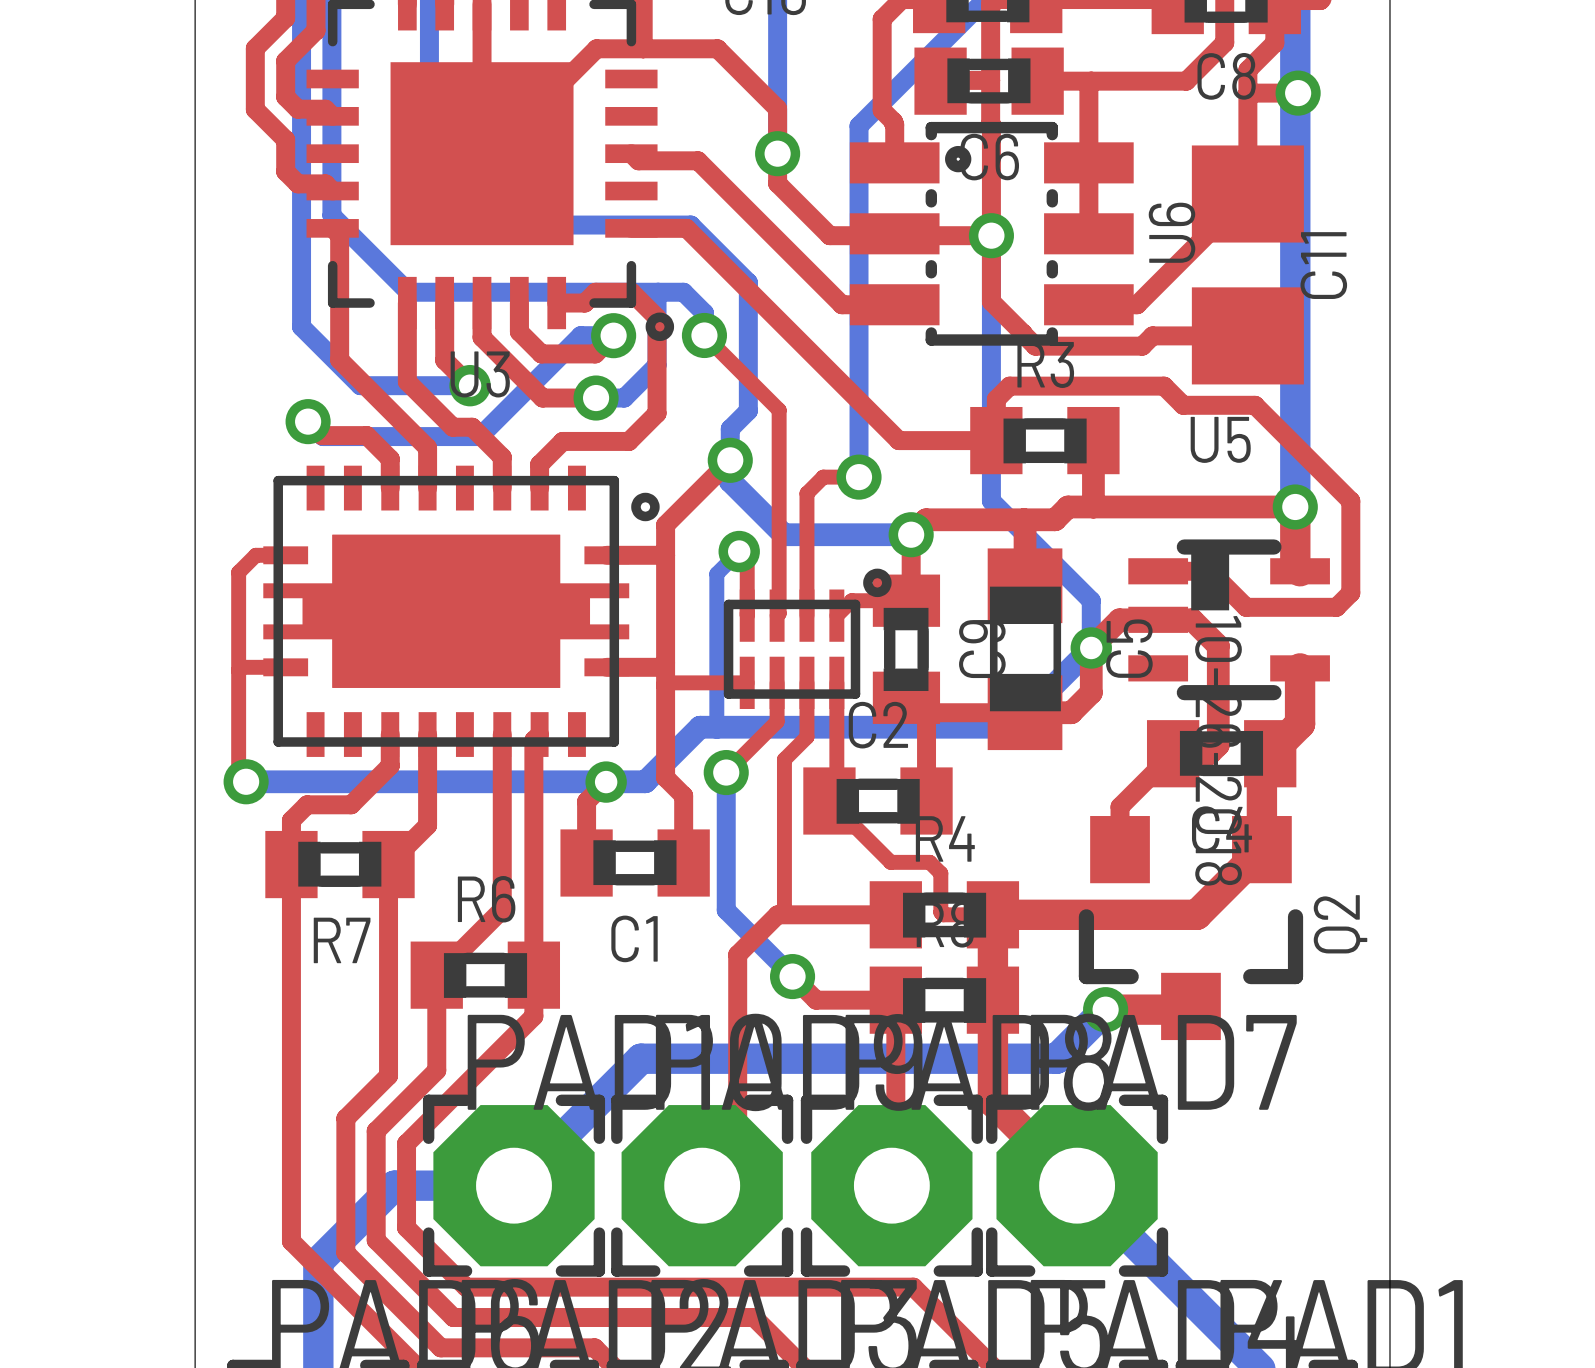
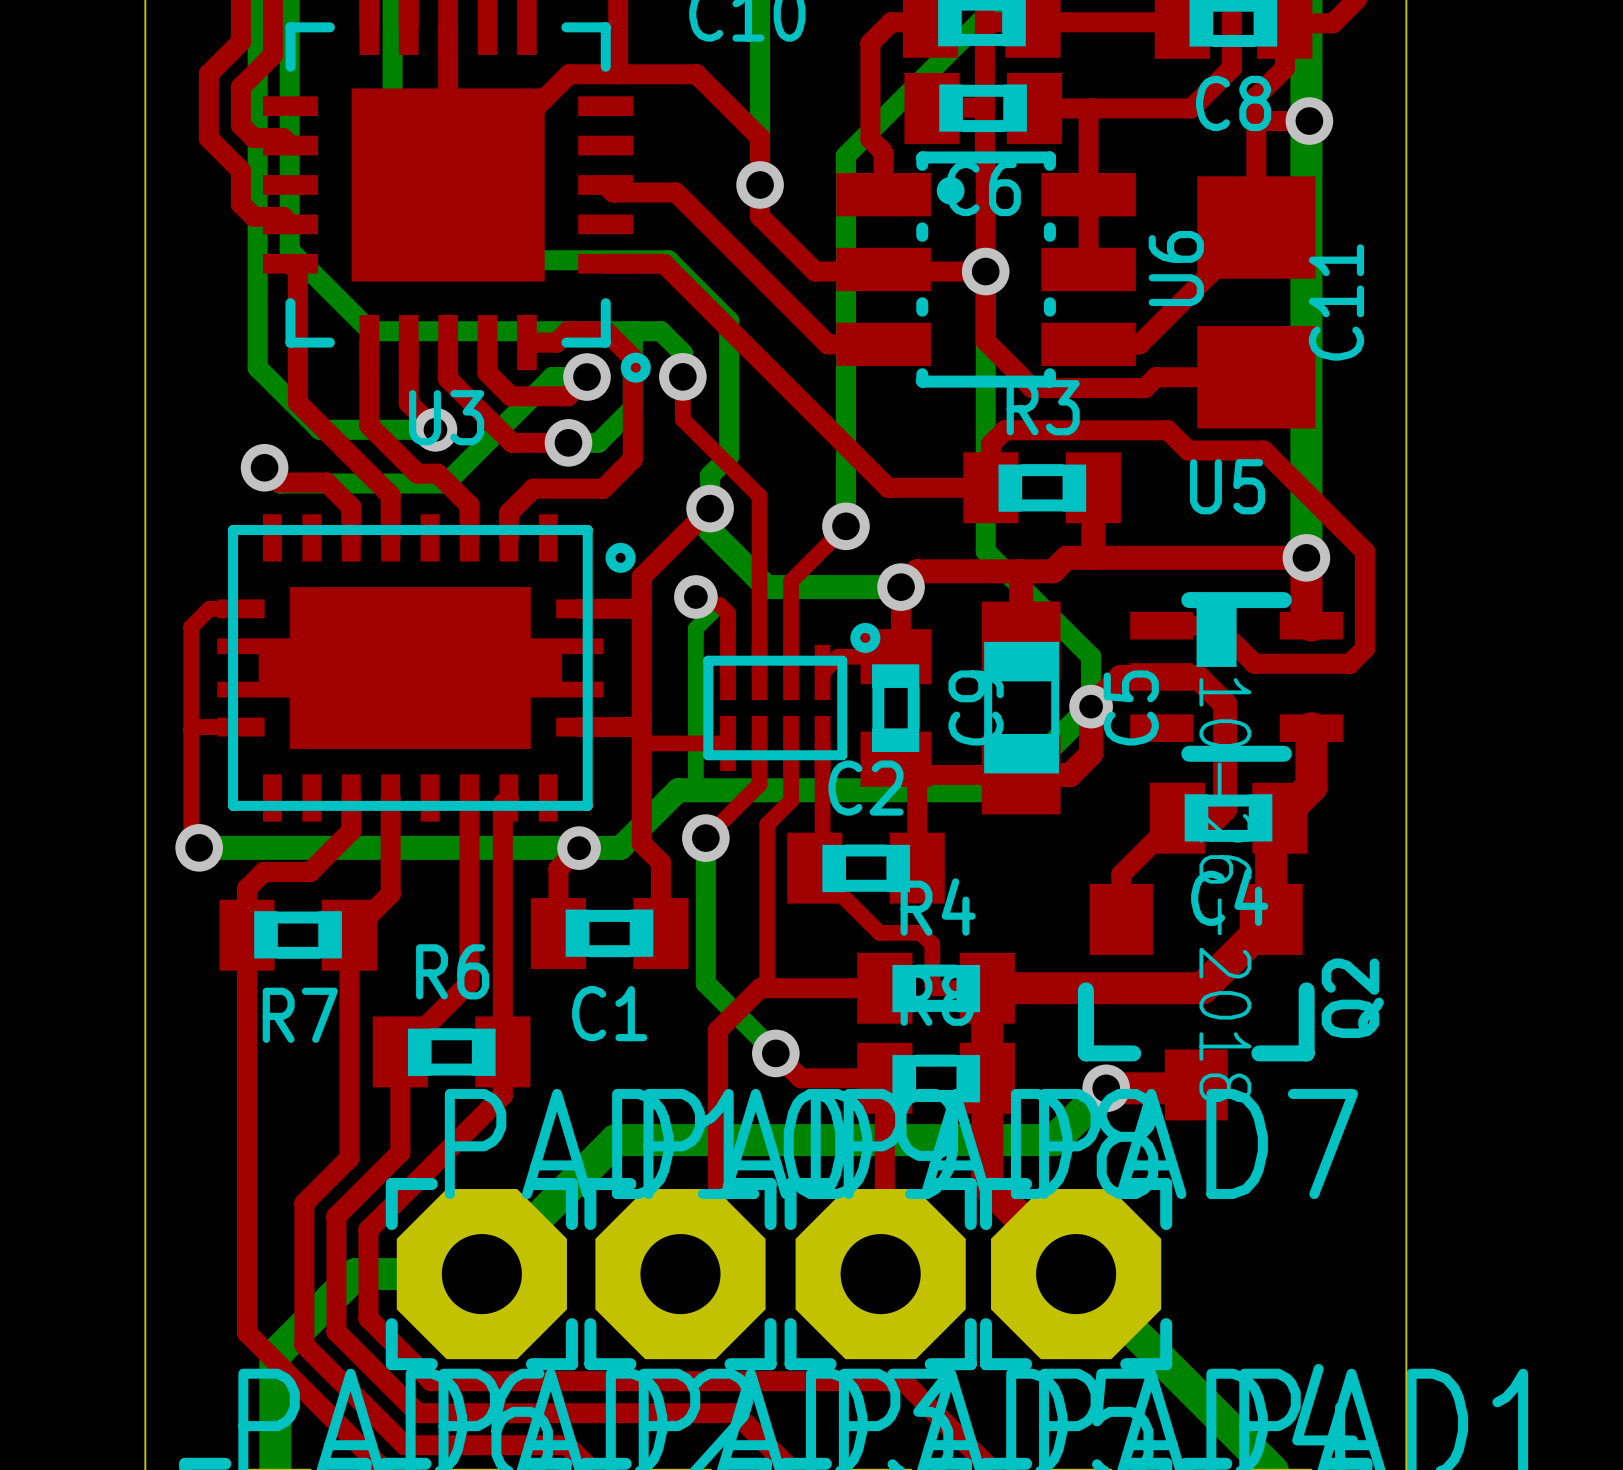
top track: (704, 335) (779, 410) (779, 613) (777, 615) -> (682, 376) (682, 419) (759, 496) (759, 672)
top track: (859, 477) (823, 477) (806, 493) (806, 529) -> (845, 526) (791, 581)
via position: (739, 551) -> (695, 596)

